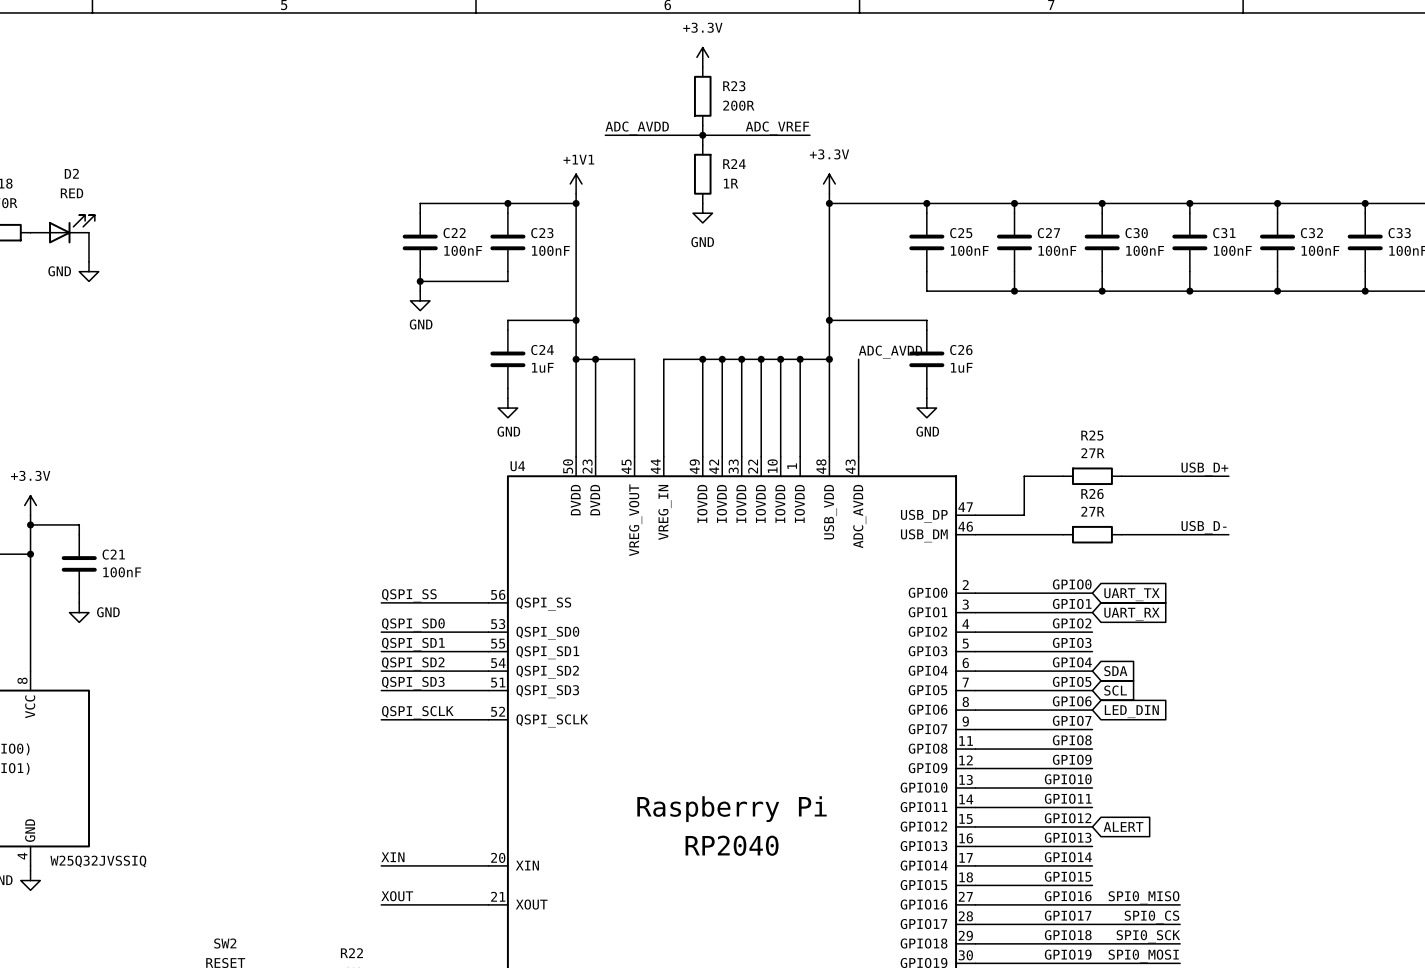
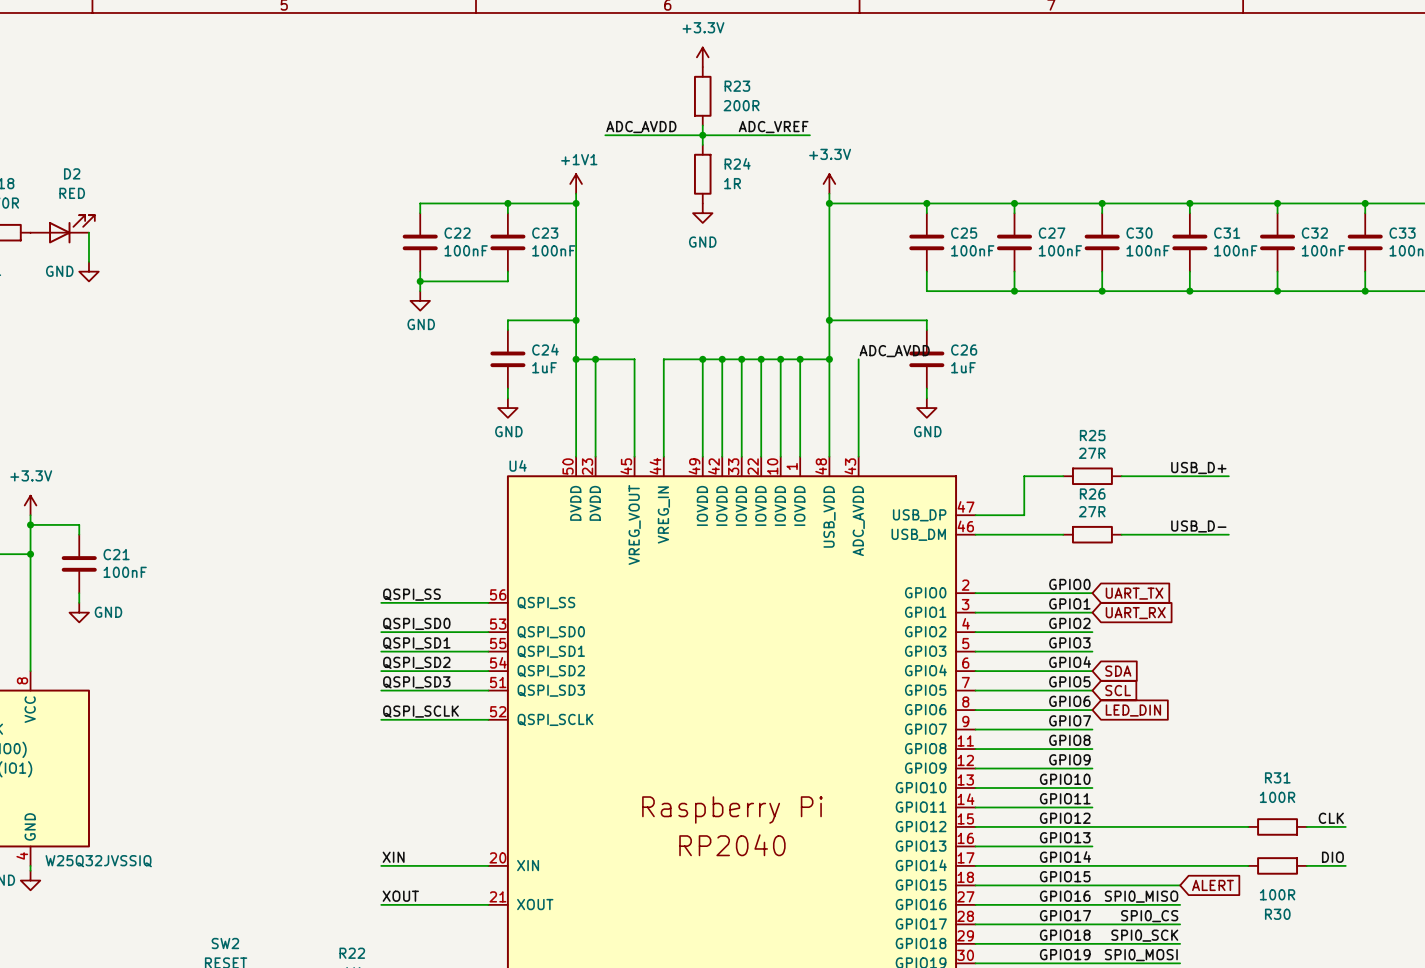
label: none -> CLK (1331, 818)
wire: none -> (1092, 826) (1248, 826)
global label position: ALERT (1123, 826) -> ALERT (1212, 885)
R31: none -> 100R (1277, 826)
wire: none -> (1306, 826) (1345, 826)
label: none -> DIO (1332, 857)
wire: none -> (1092, 865) (1248, 865)
R30: none -> 100R (1277, 865)
wire: none -> (1306, 865) (1345, 865)
wire: none -> (1092, 885) (1180, 885)

